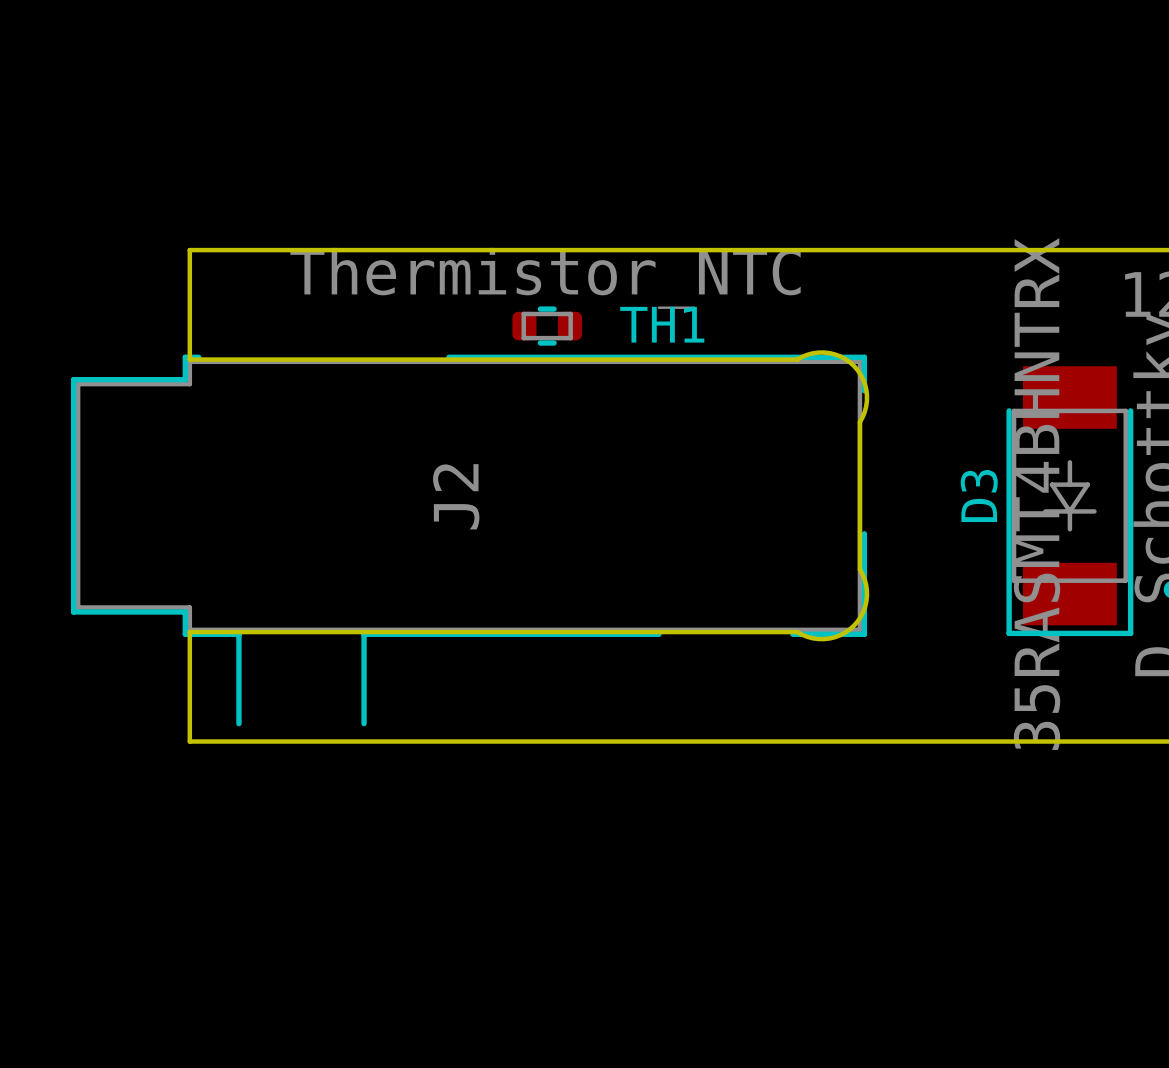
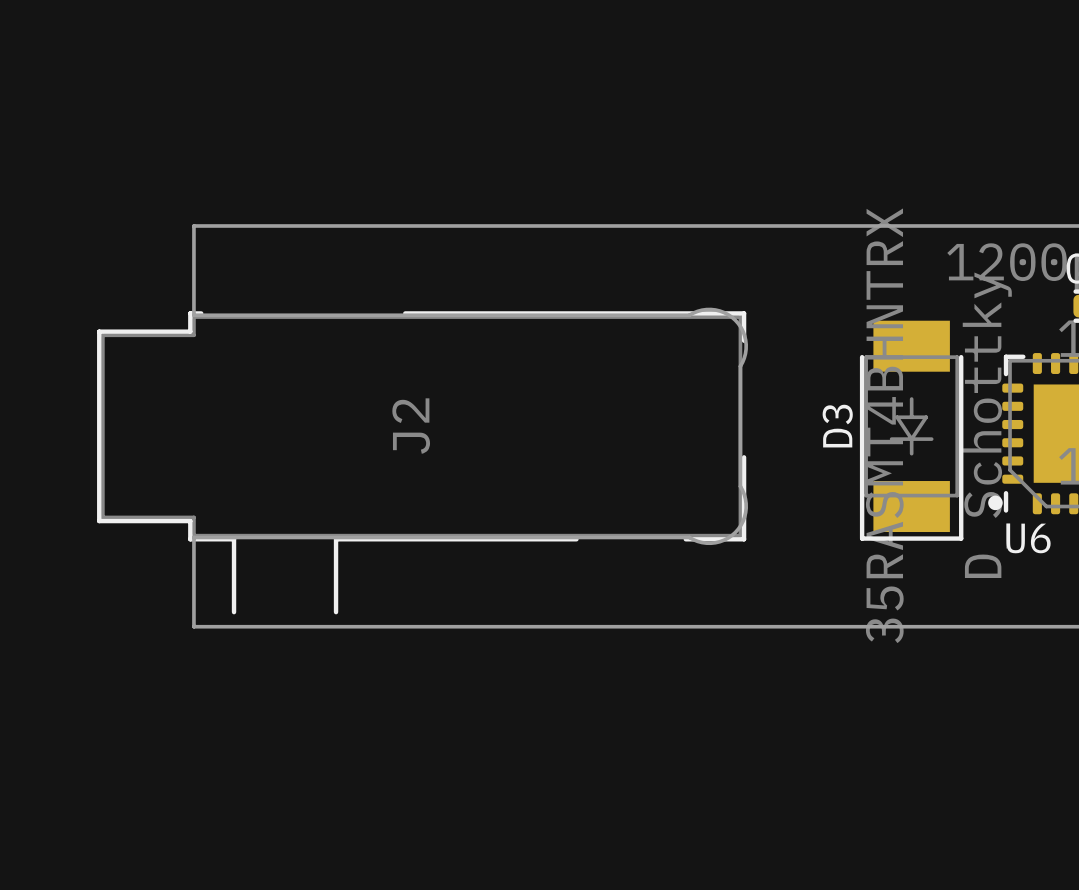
TH1: Thermistor_NTC (547, 326) -> none

